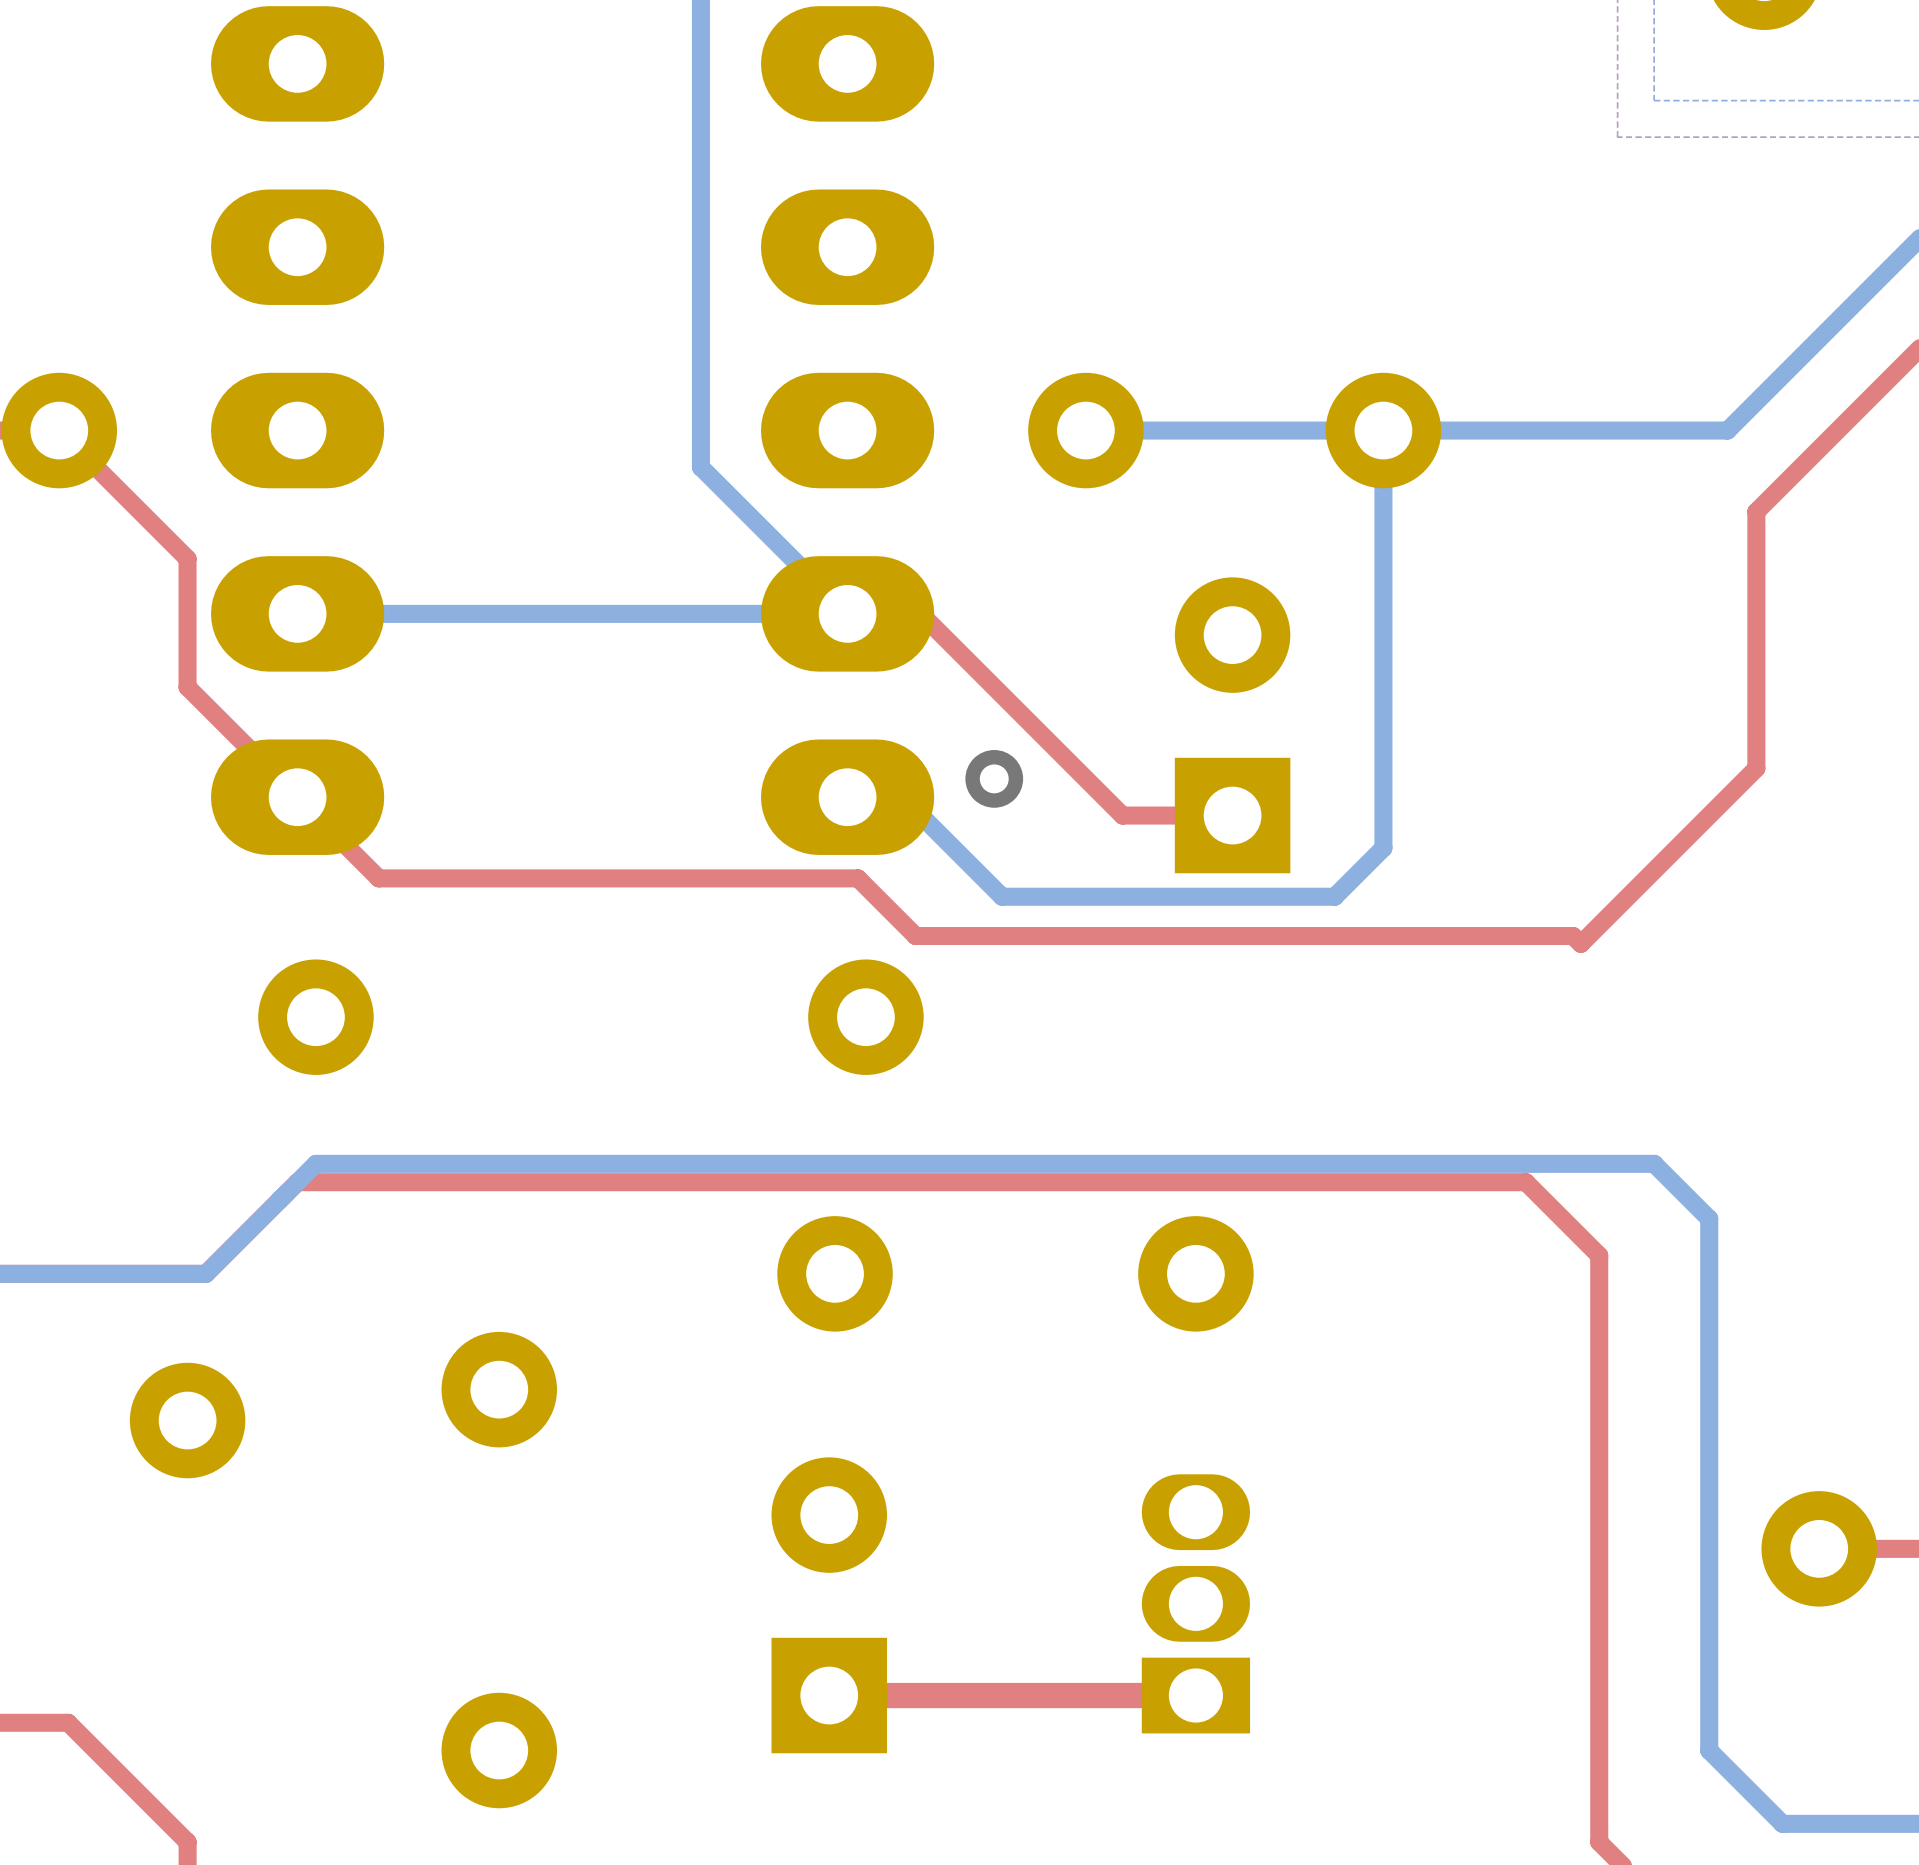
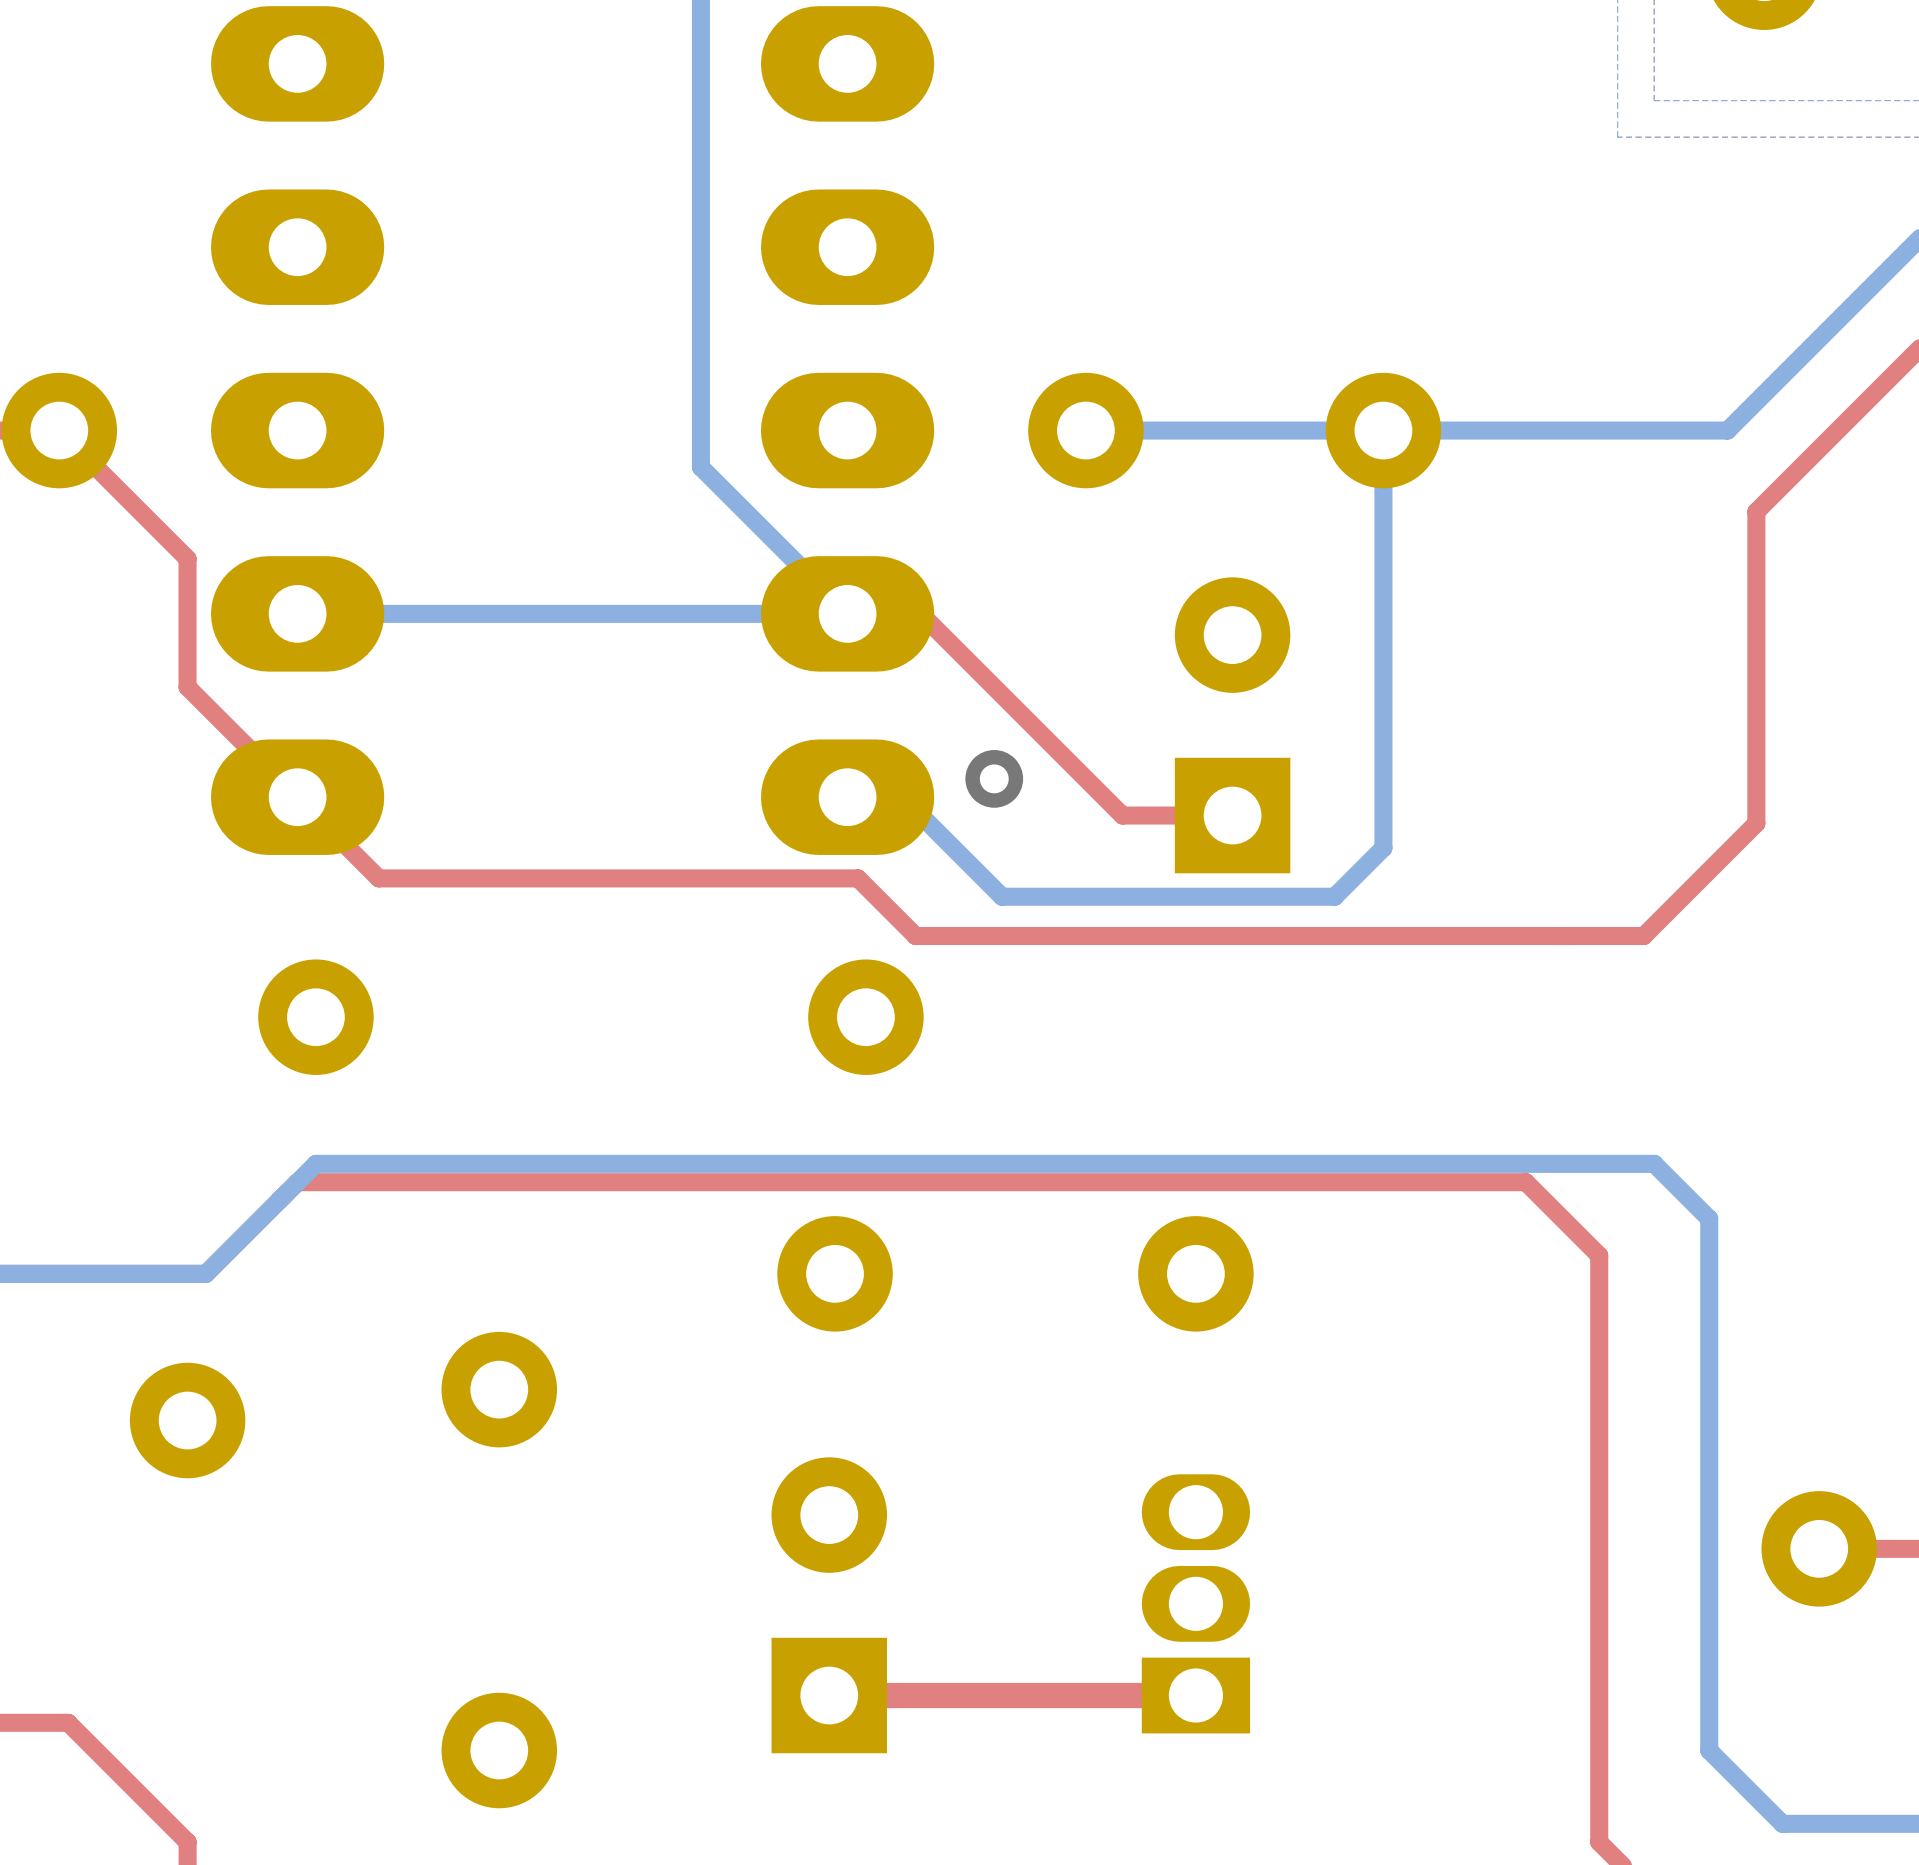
top track: (1756, 768) (1580, 943) (1573, 936) -> (1756, 768) (1756, 823) (1643, 936) (1573, 936)

